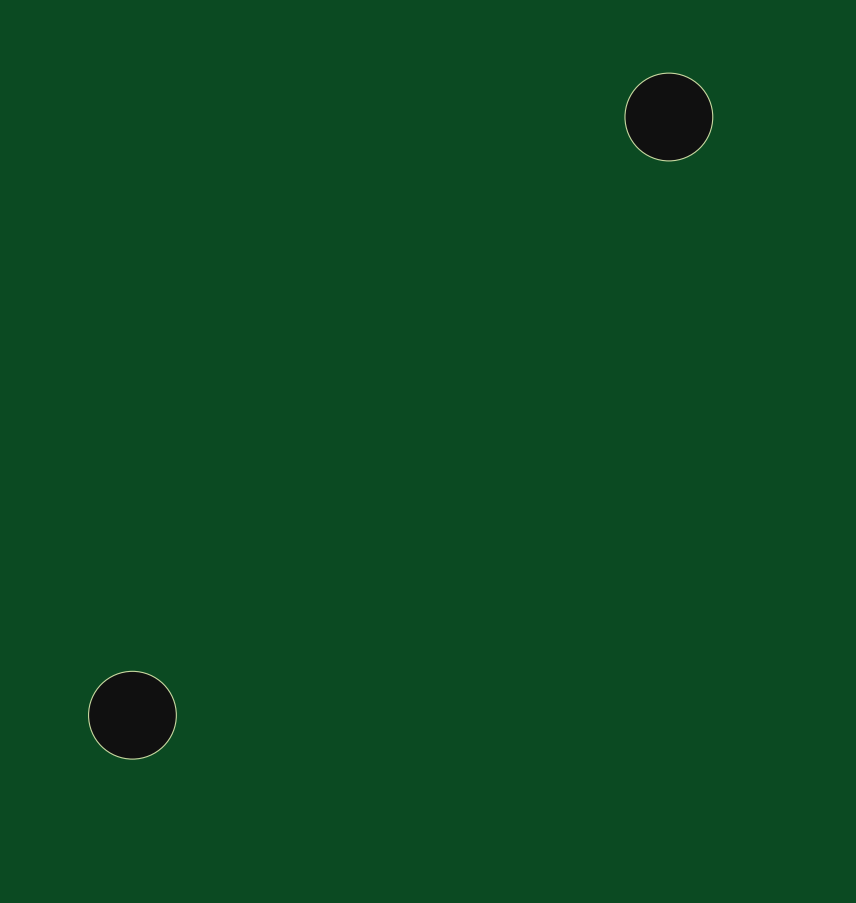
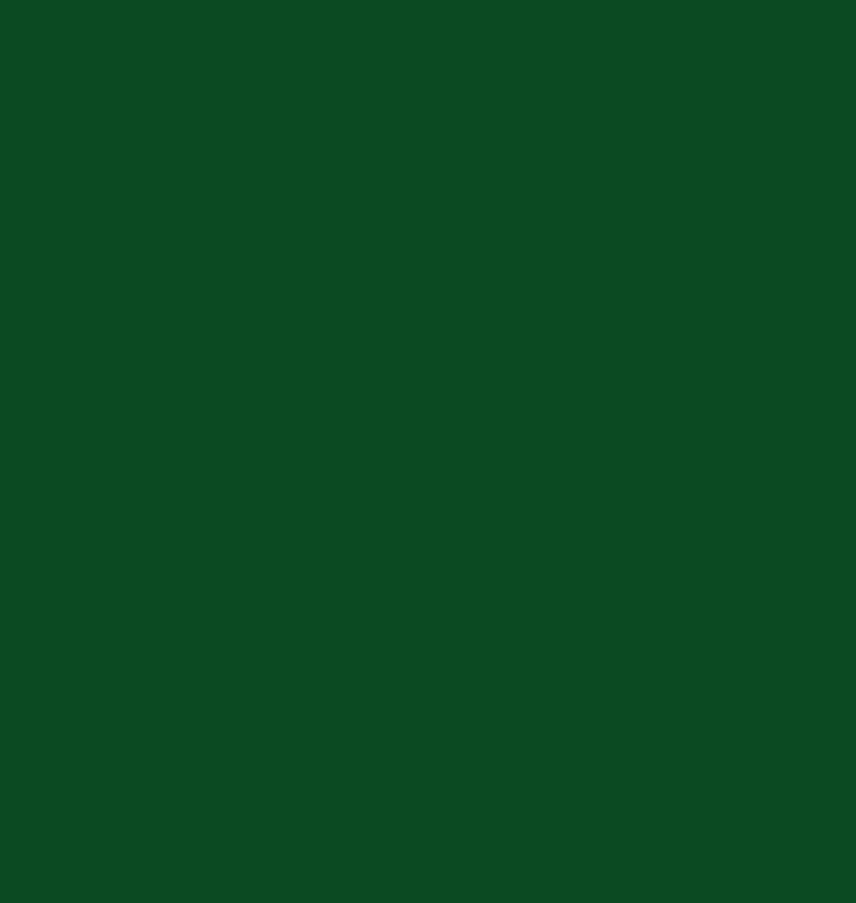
part: (668, 117) -> none
part: (132, 715) -> none

